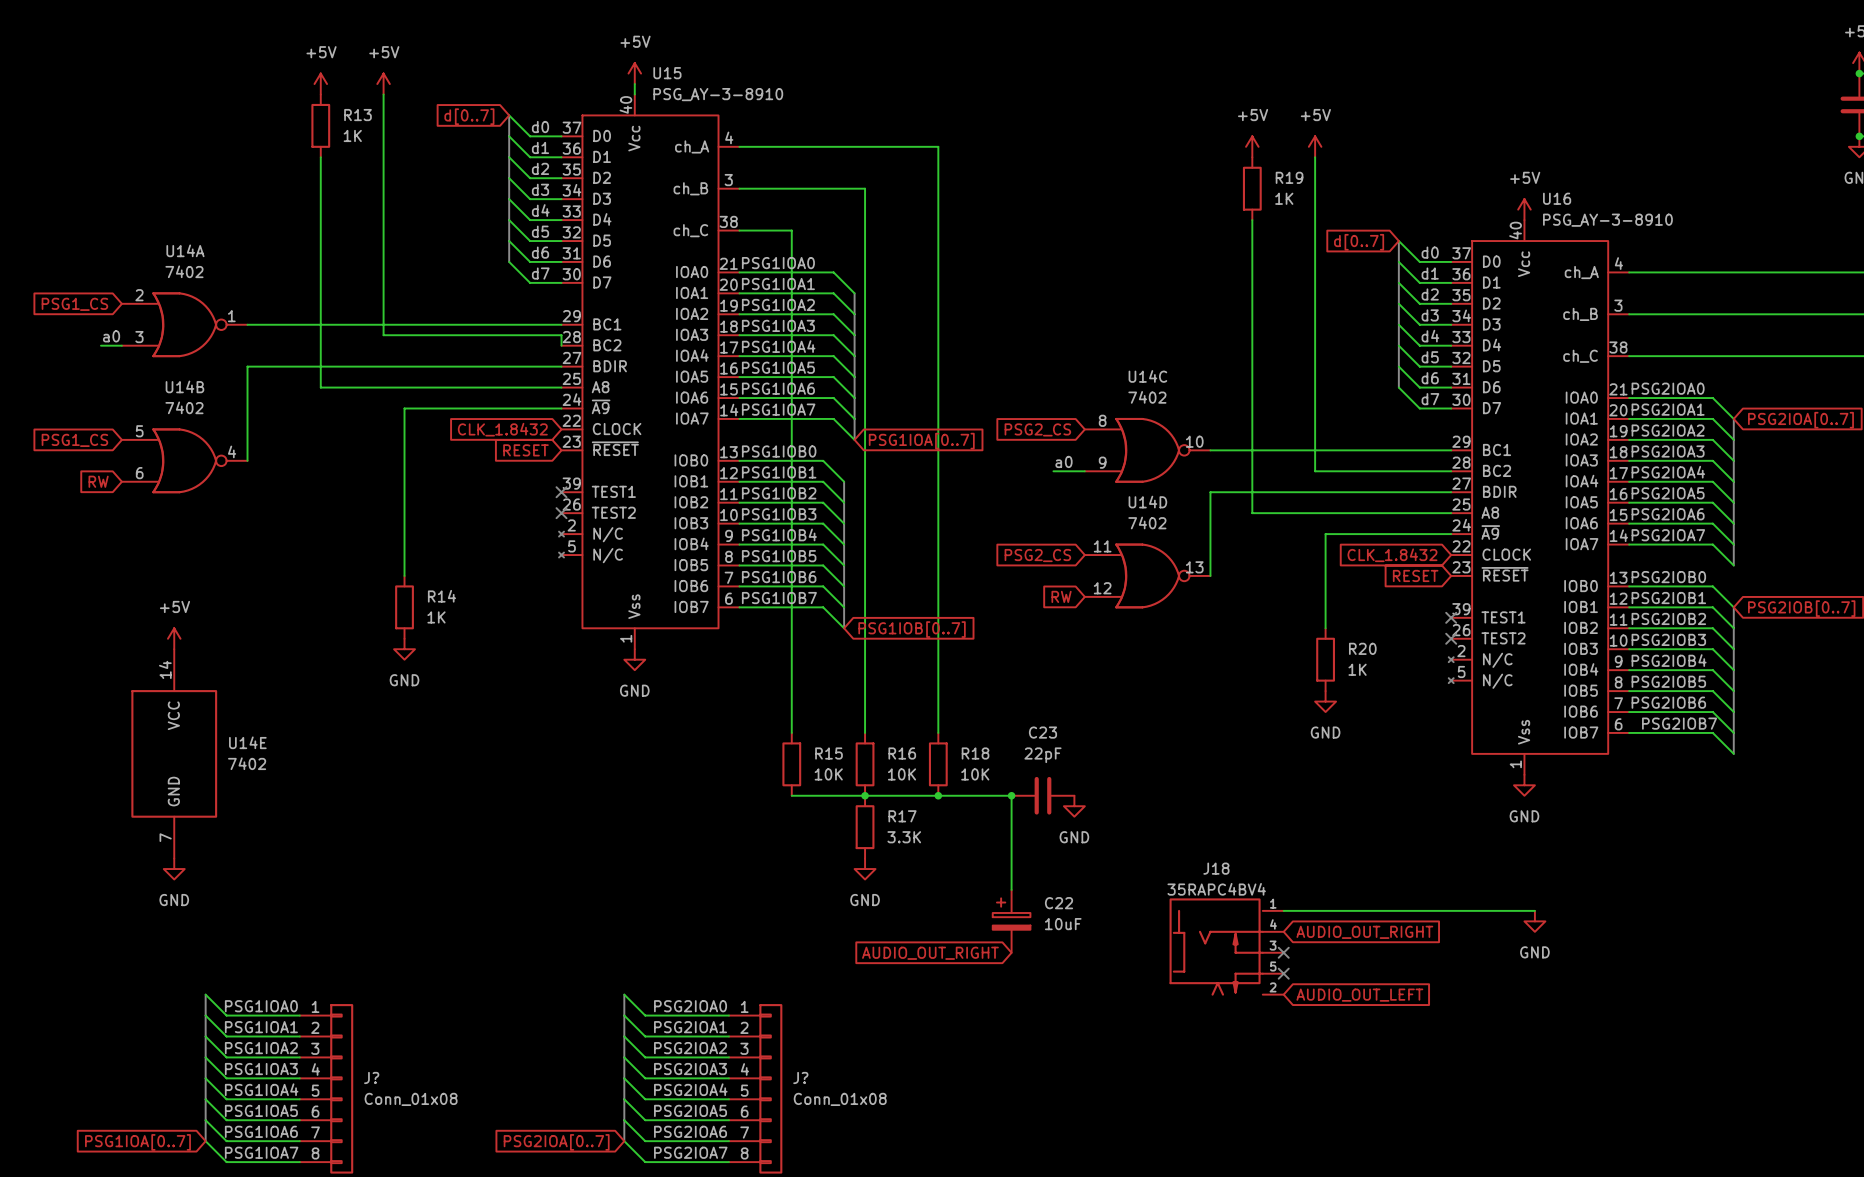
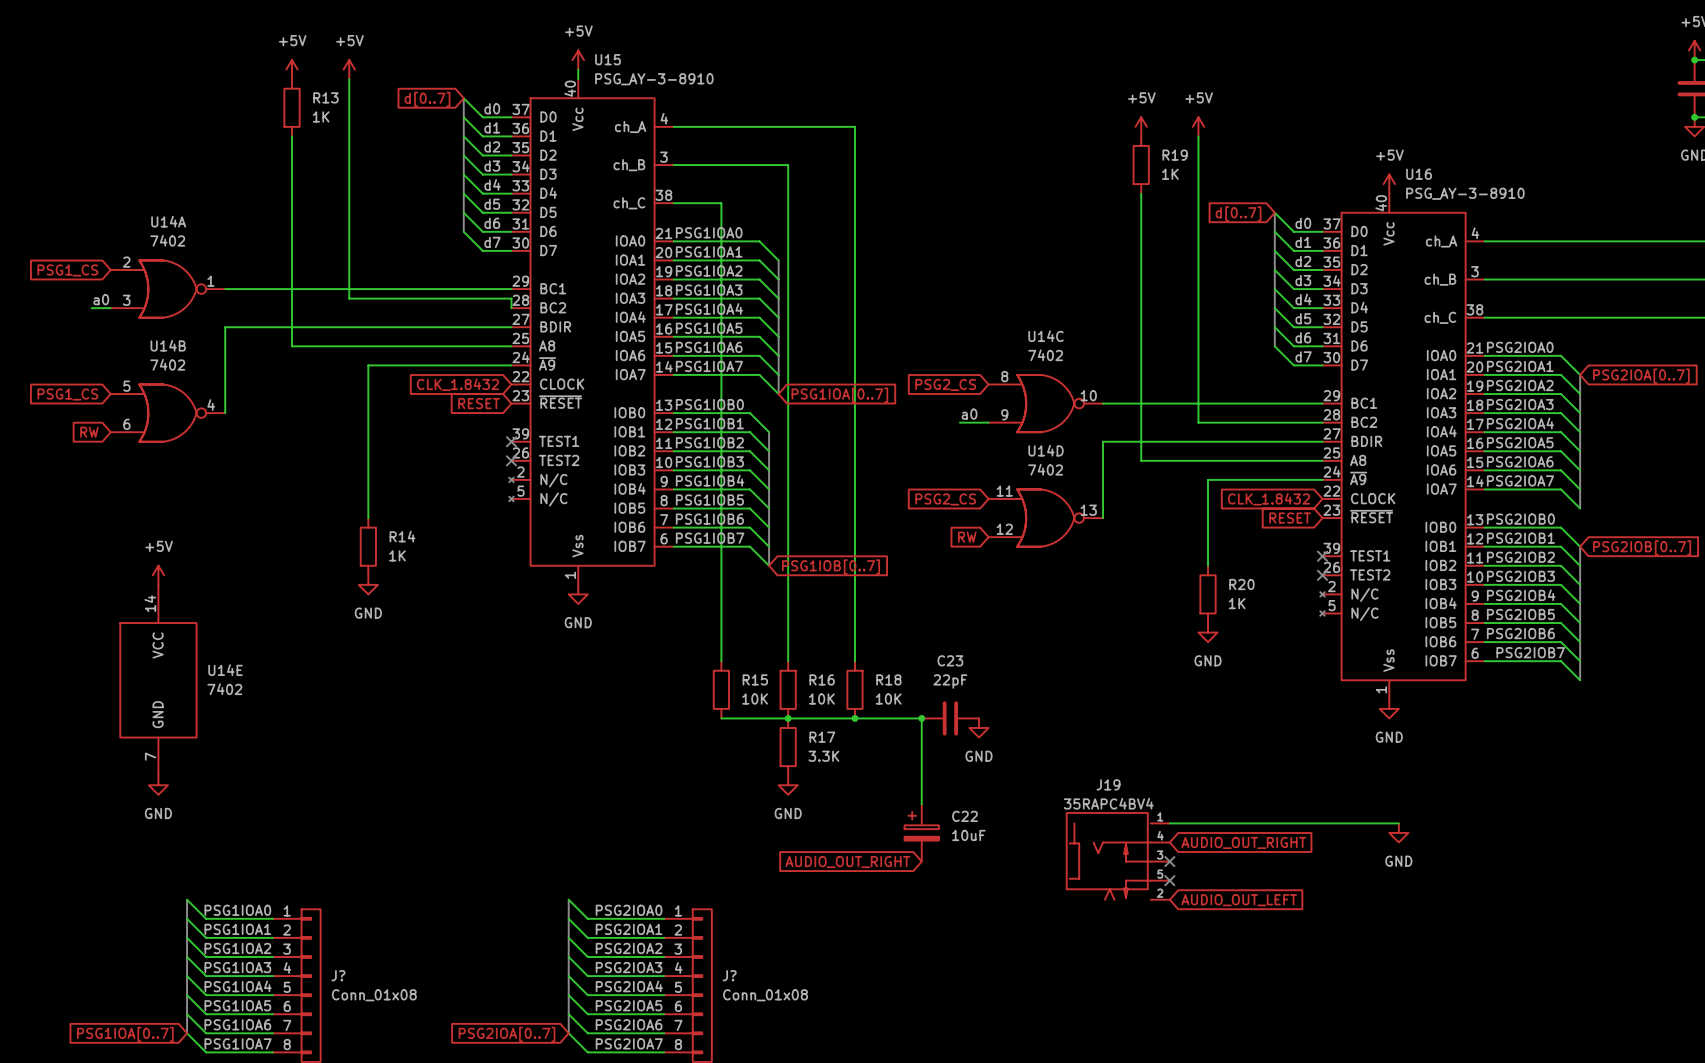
J18 name: J18 (1216, 868) -> J19 (1108, 784)

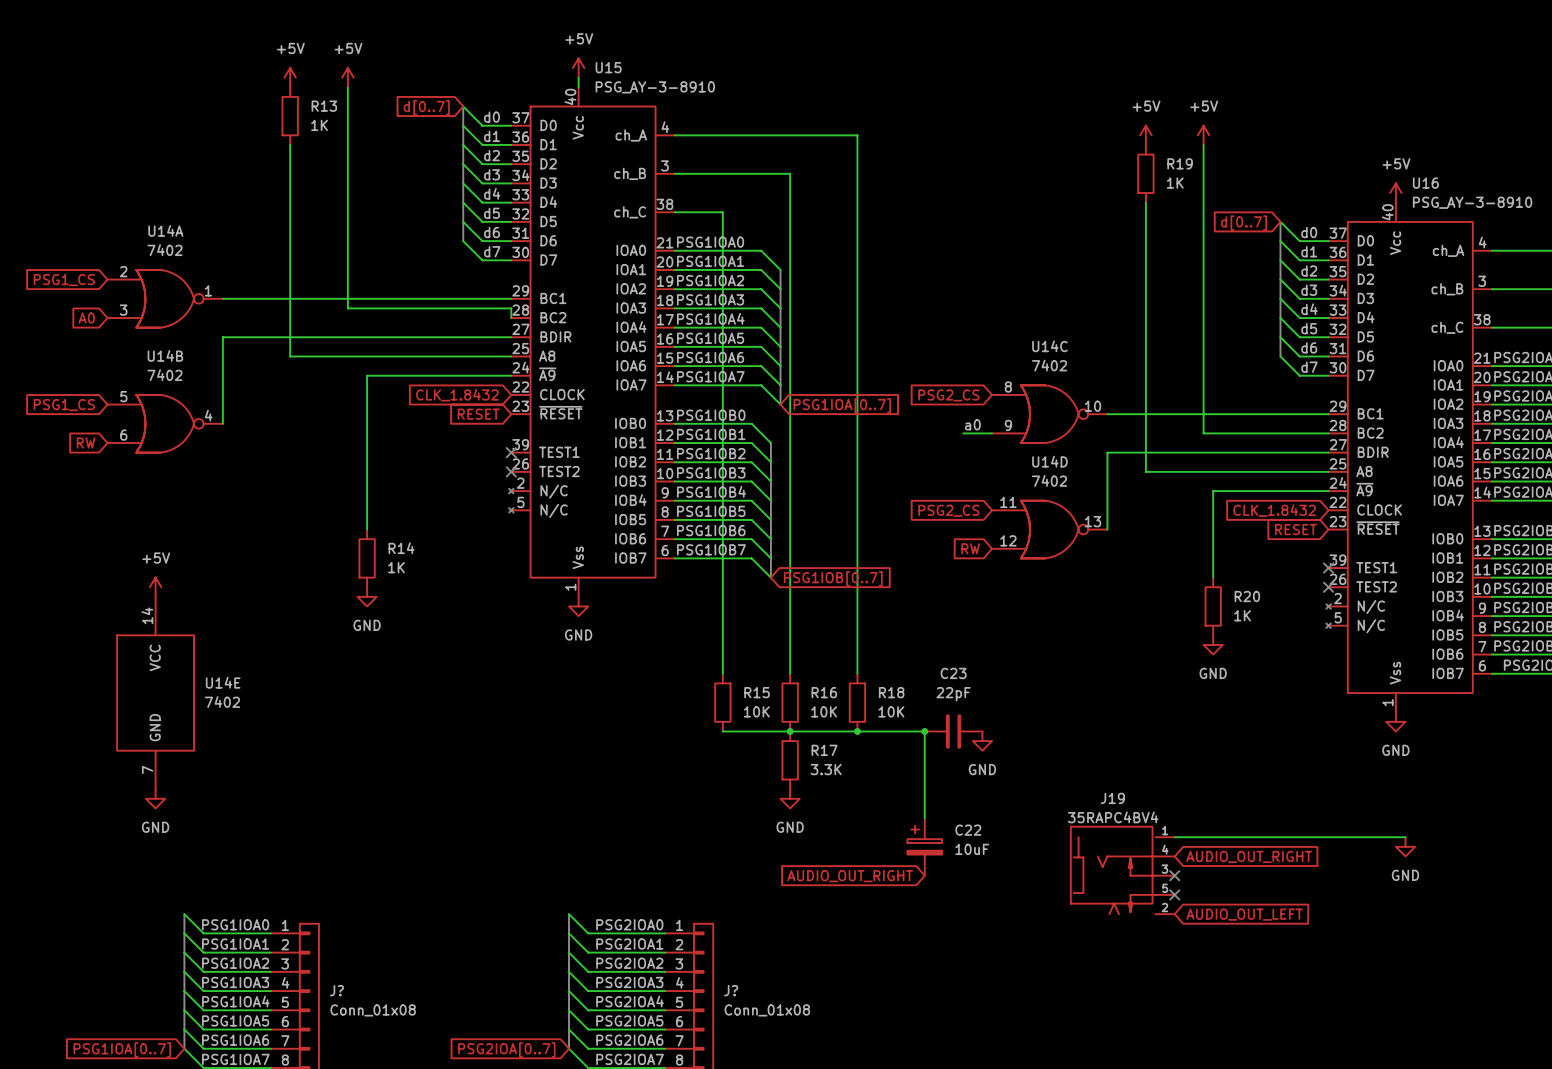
label: a0 (101, 299) -> none
global label: none -> A0 (86, 318)
wire: (91, 308) (110, 308) -> none

